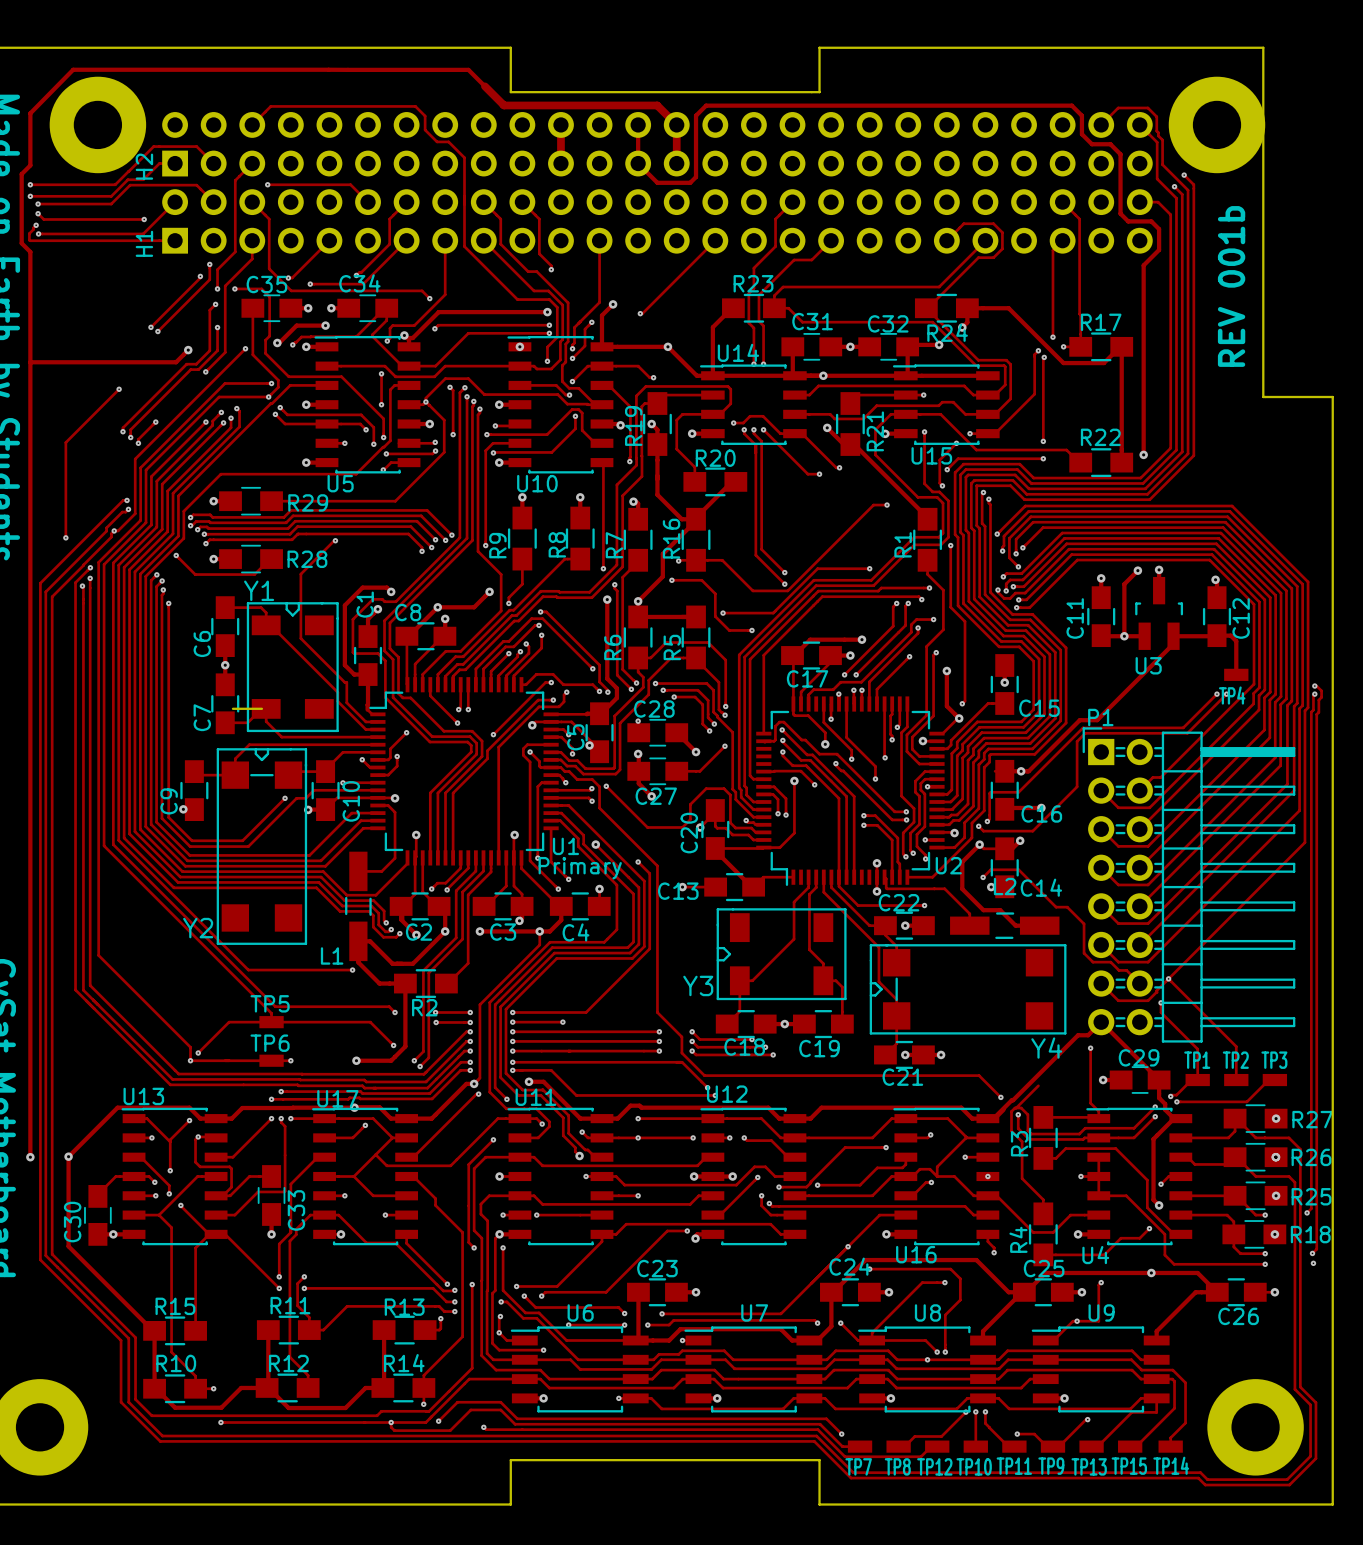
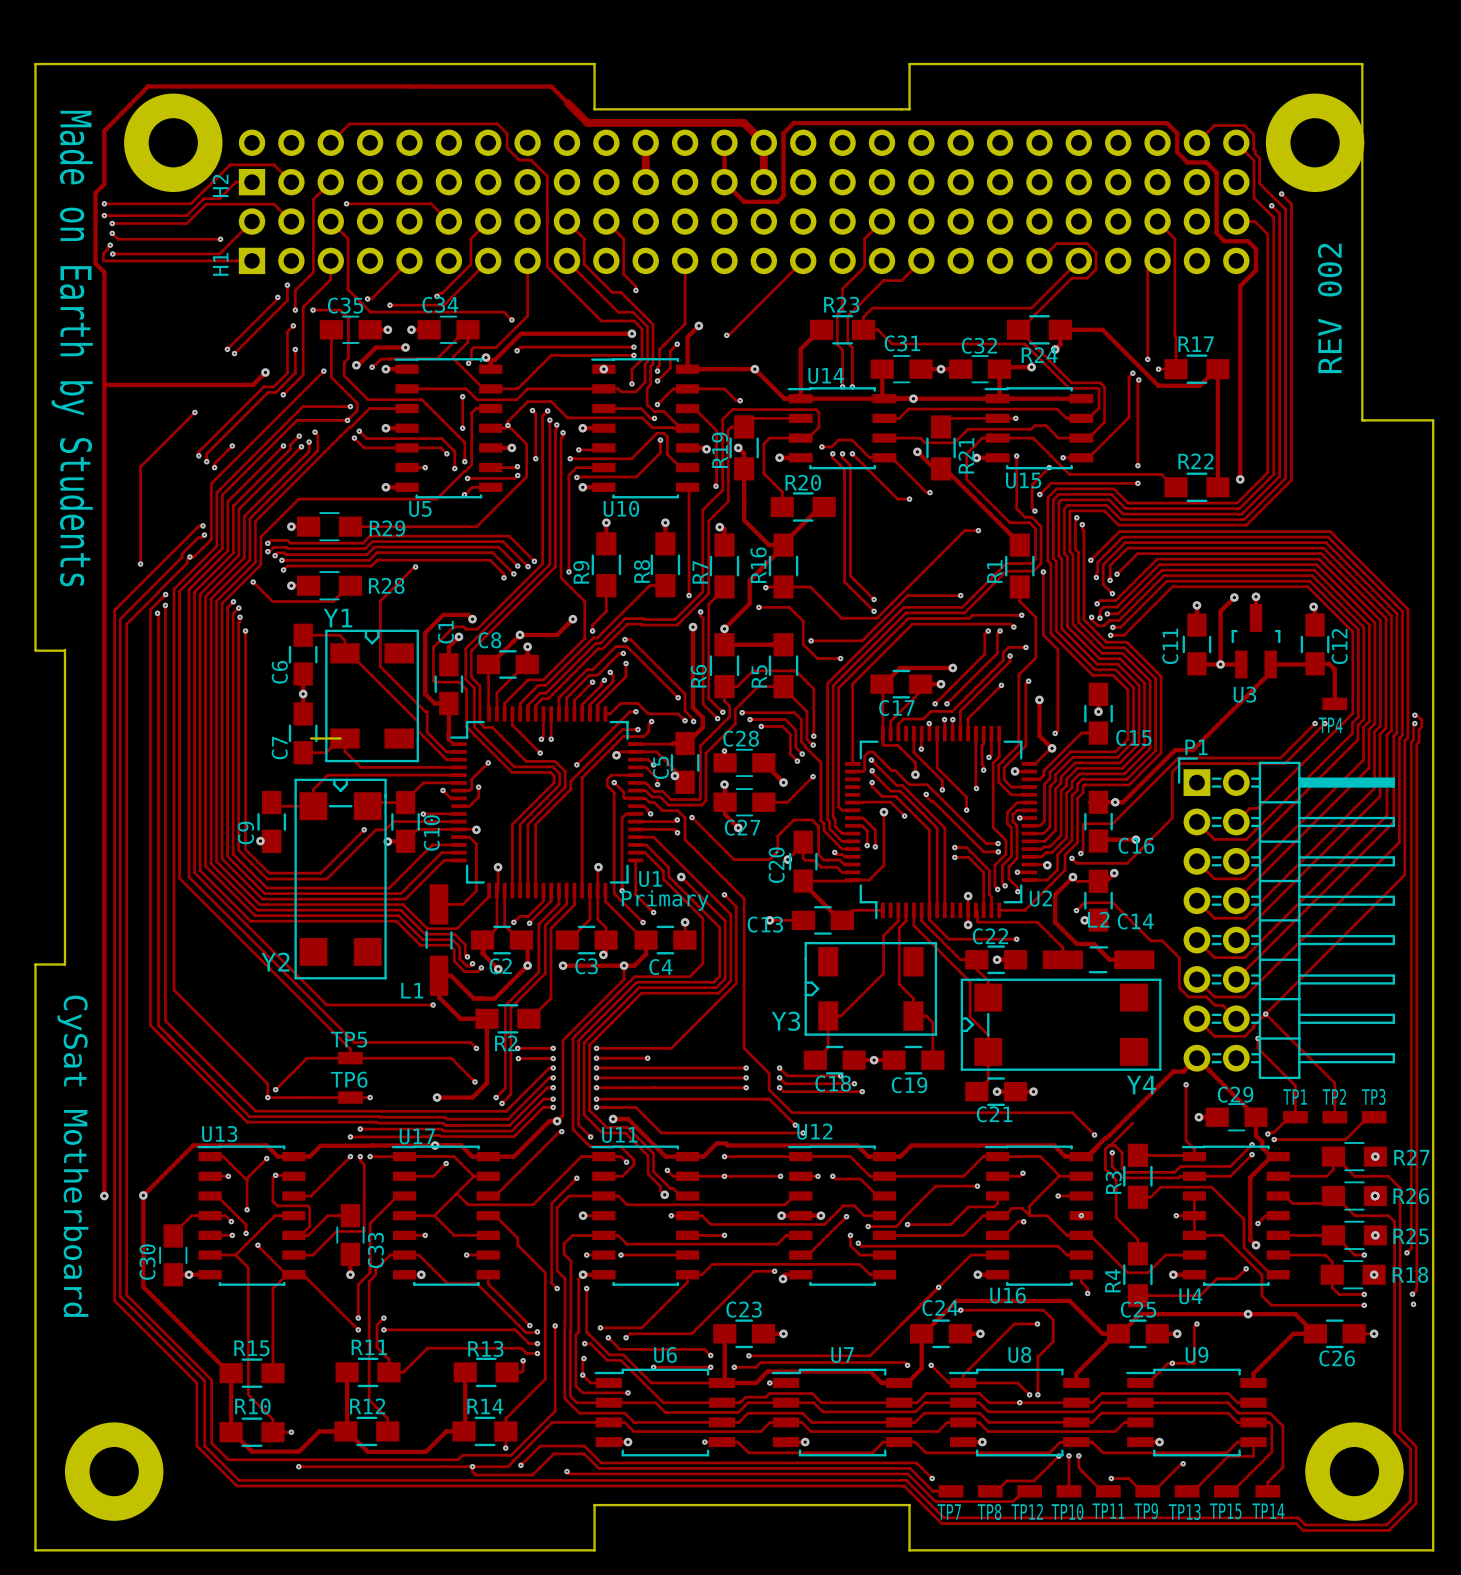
text: REV 001b (1231, 286) -> REV 002 (1329, 308)

